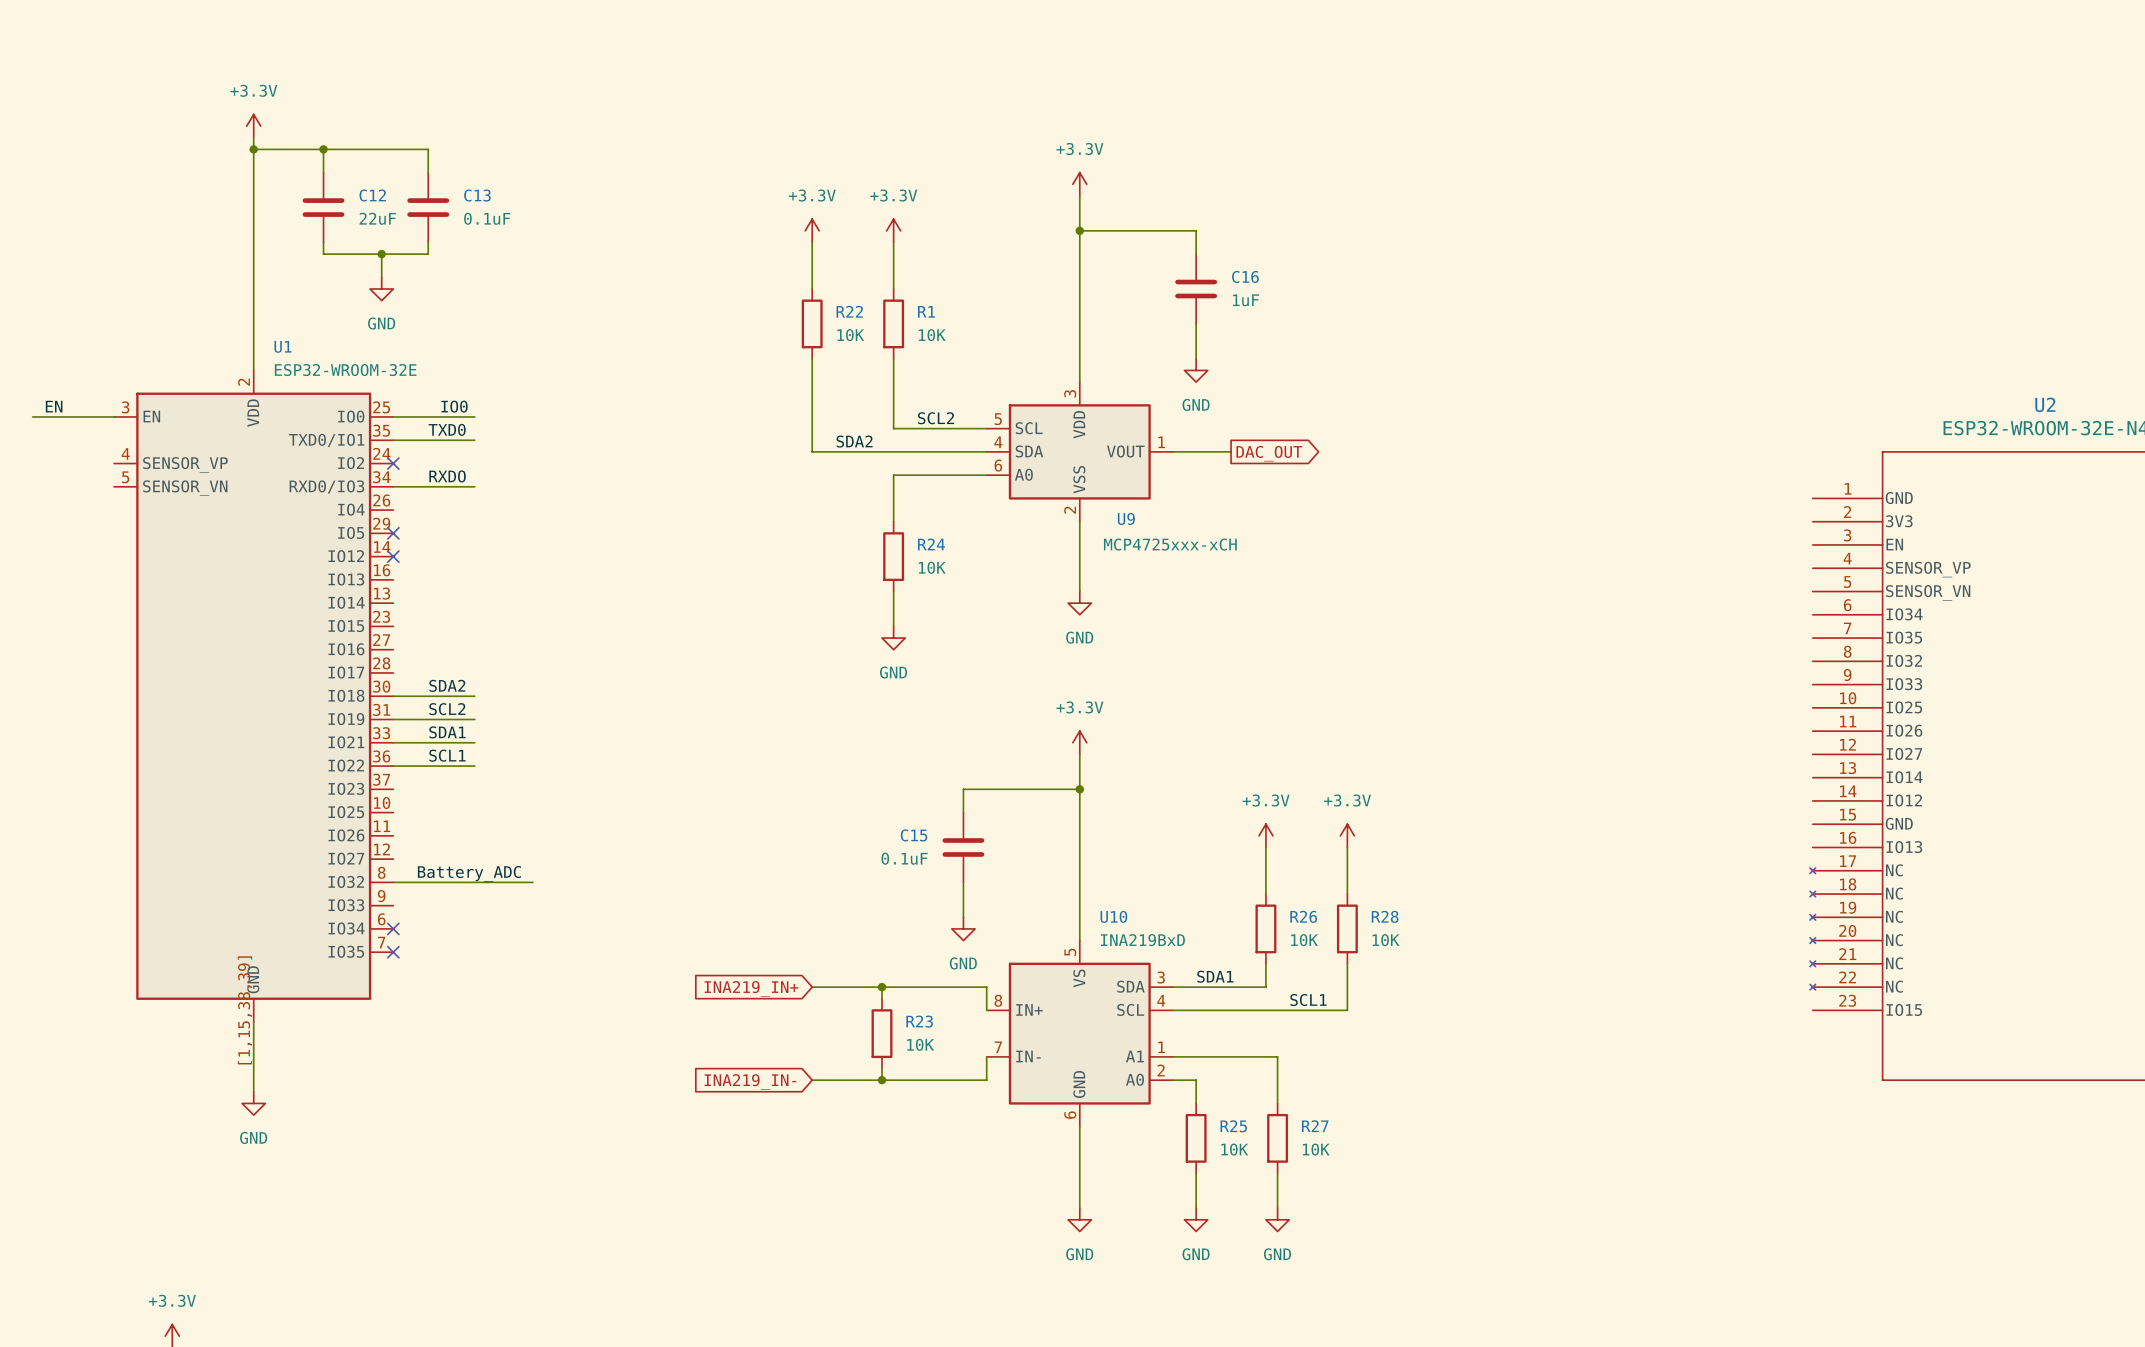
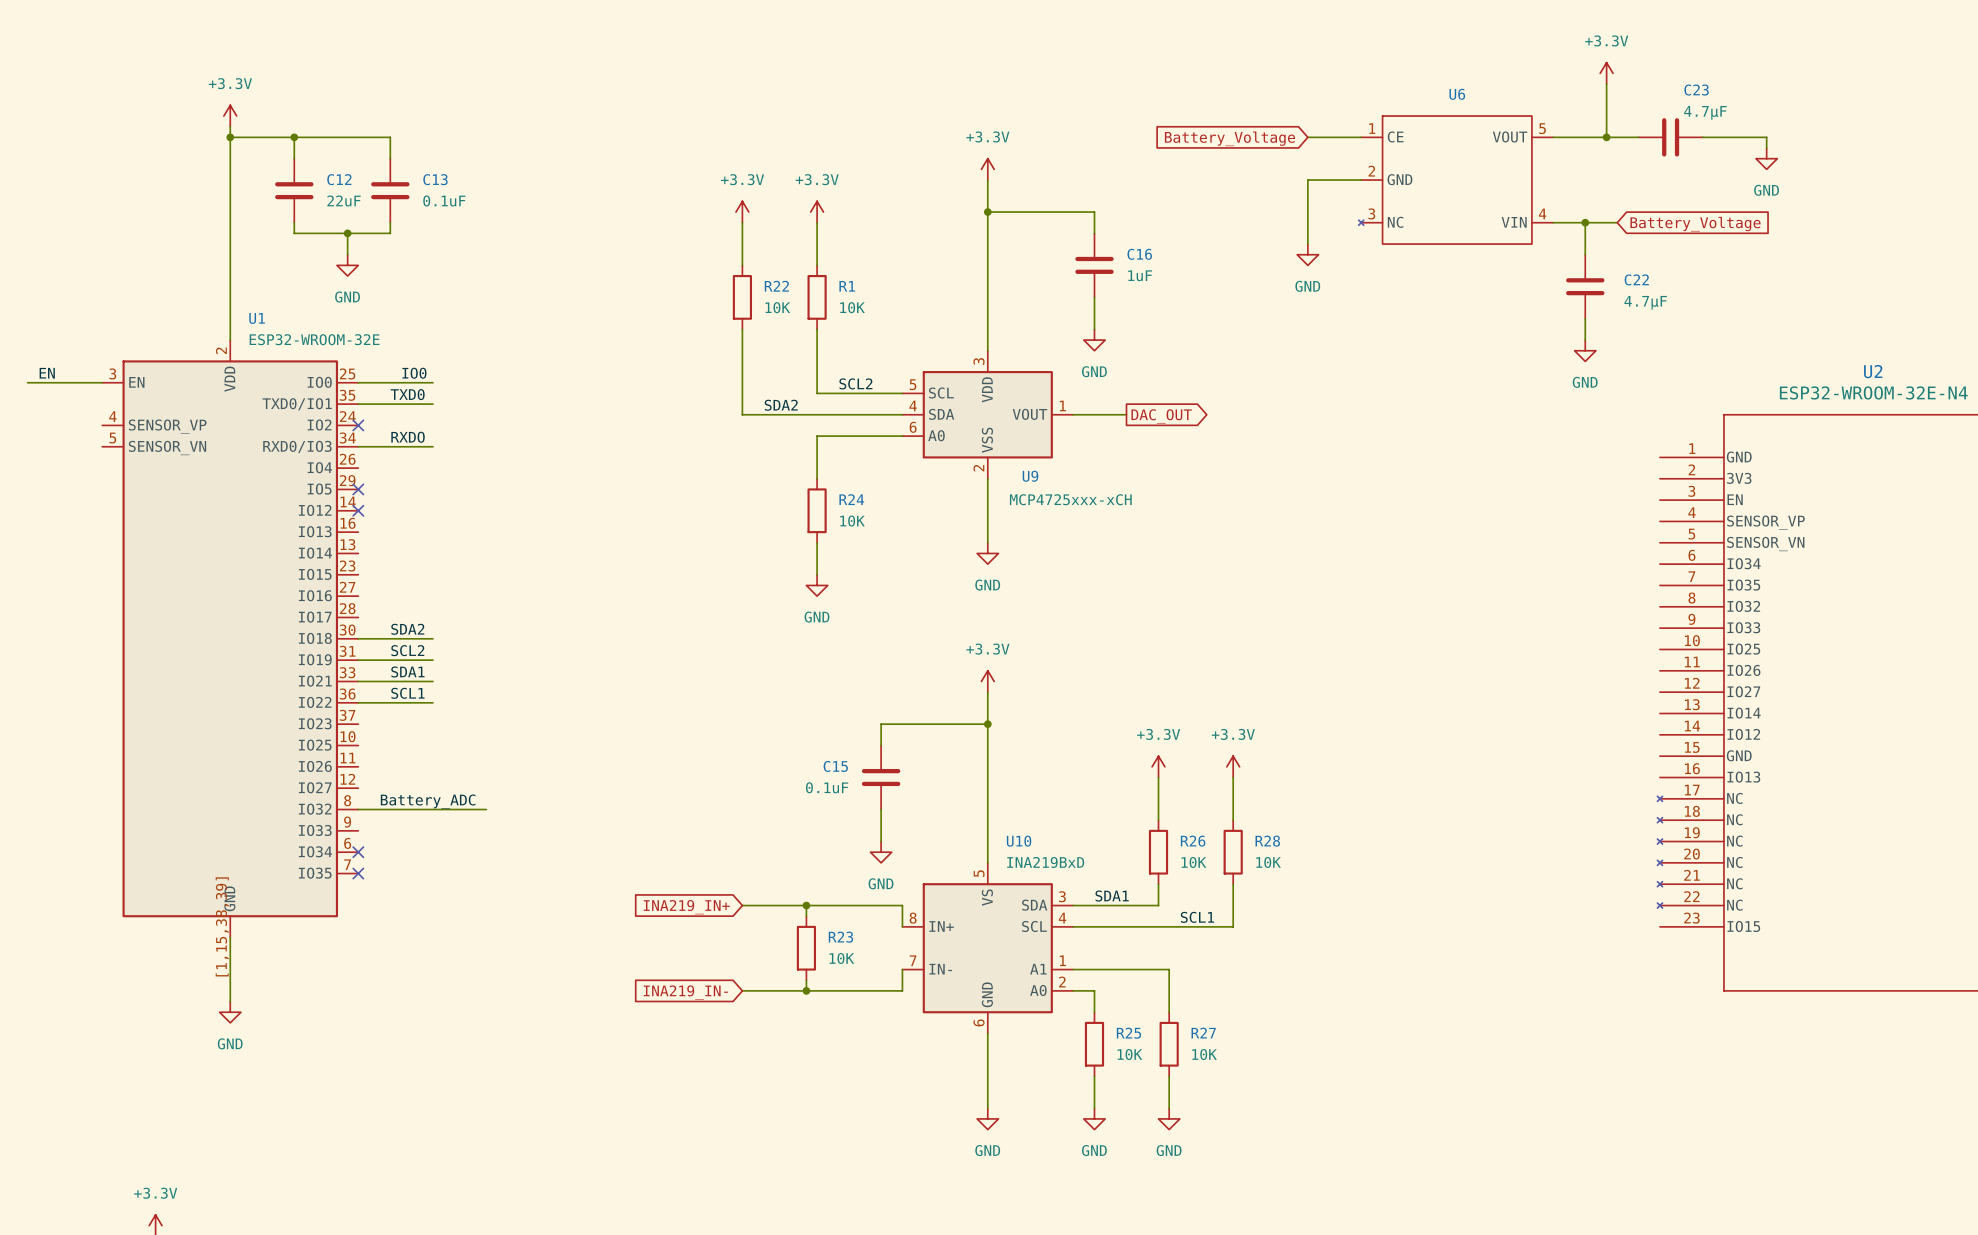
power symbol: none -> +3.3V (1606, 73)
wire: none -> (1606, 84) (1606, 137)
wire: none -> (1307, 137) (1361, 137)
wire: none -> (1553, 137) (1638, 137)
junction: none -> (1606, 137)
C23: none -> 4.7µF (1670, 137)
wire: none -> (1702, 137) (1766, 137) (1766, 148)
global label: none -> Battery_Voltage (1229, 138)
power symbol: none -> GND (1766, 158)
wire: none -> (1361, 180) (1307, 180) (1307, 244)
U6: none -> (1455, 180)
wire: none -> (1553, 222) (1617, 222)
wire: none -> (1585, 222) (1585, 254)
junction: none -> (1585, 222)
global label: none -> Battery_Voltage (1695, 224)
power symbol: none -> GND (1307, 254)
C22: none -> 4.7µF (1585, 286)
wire: none -> (1585, 318) (1585, 340)
power symbol: none -> GND (1585, 350)

